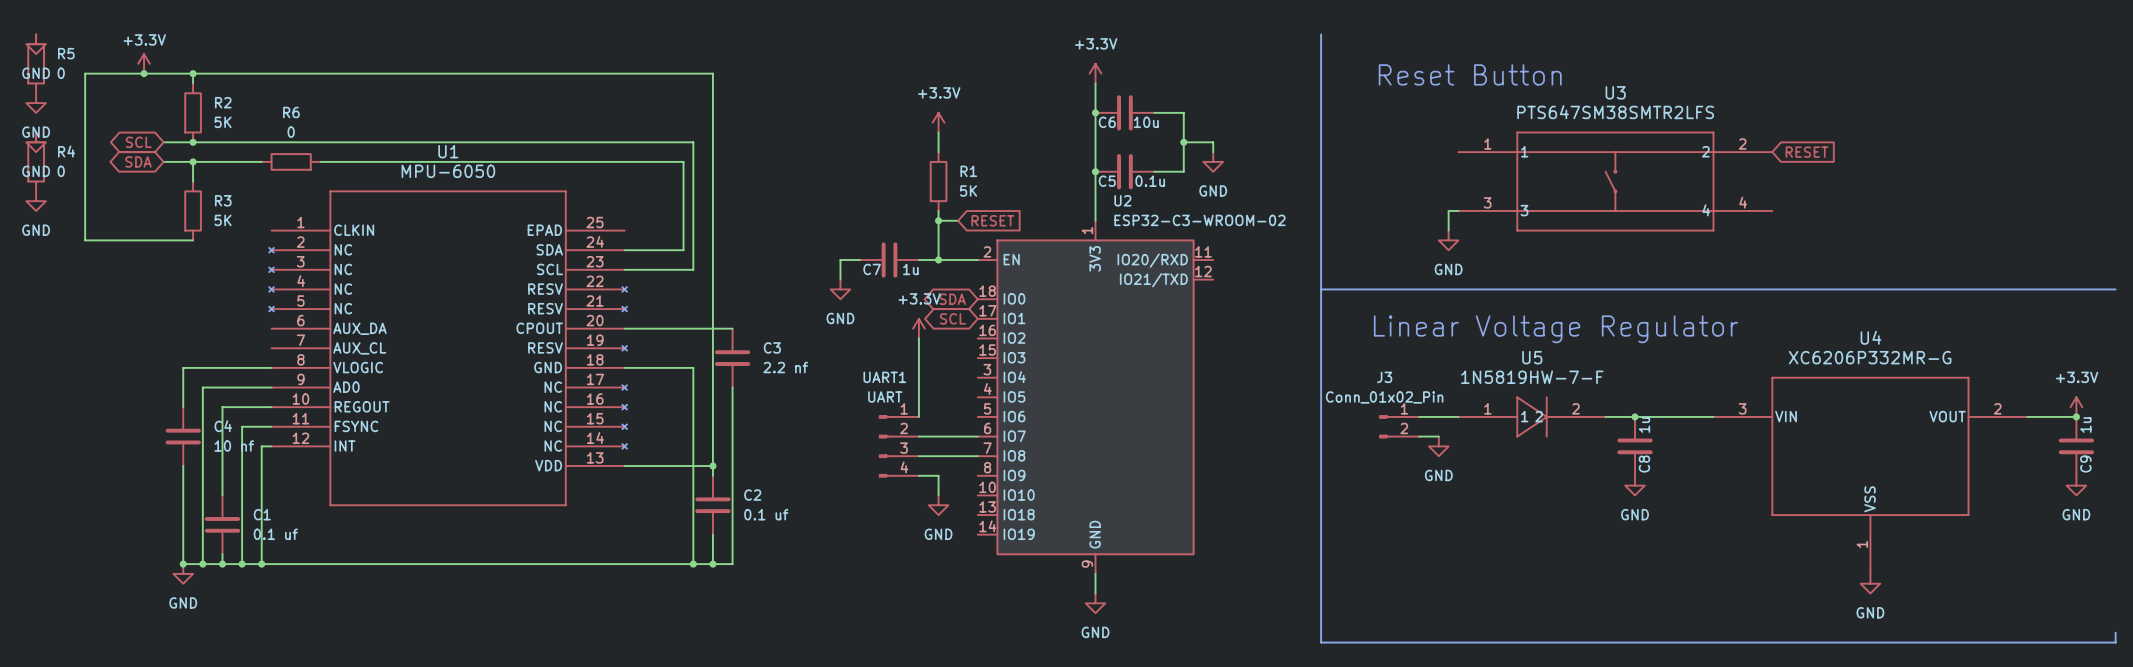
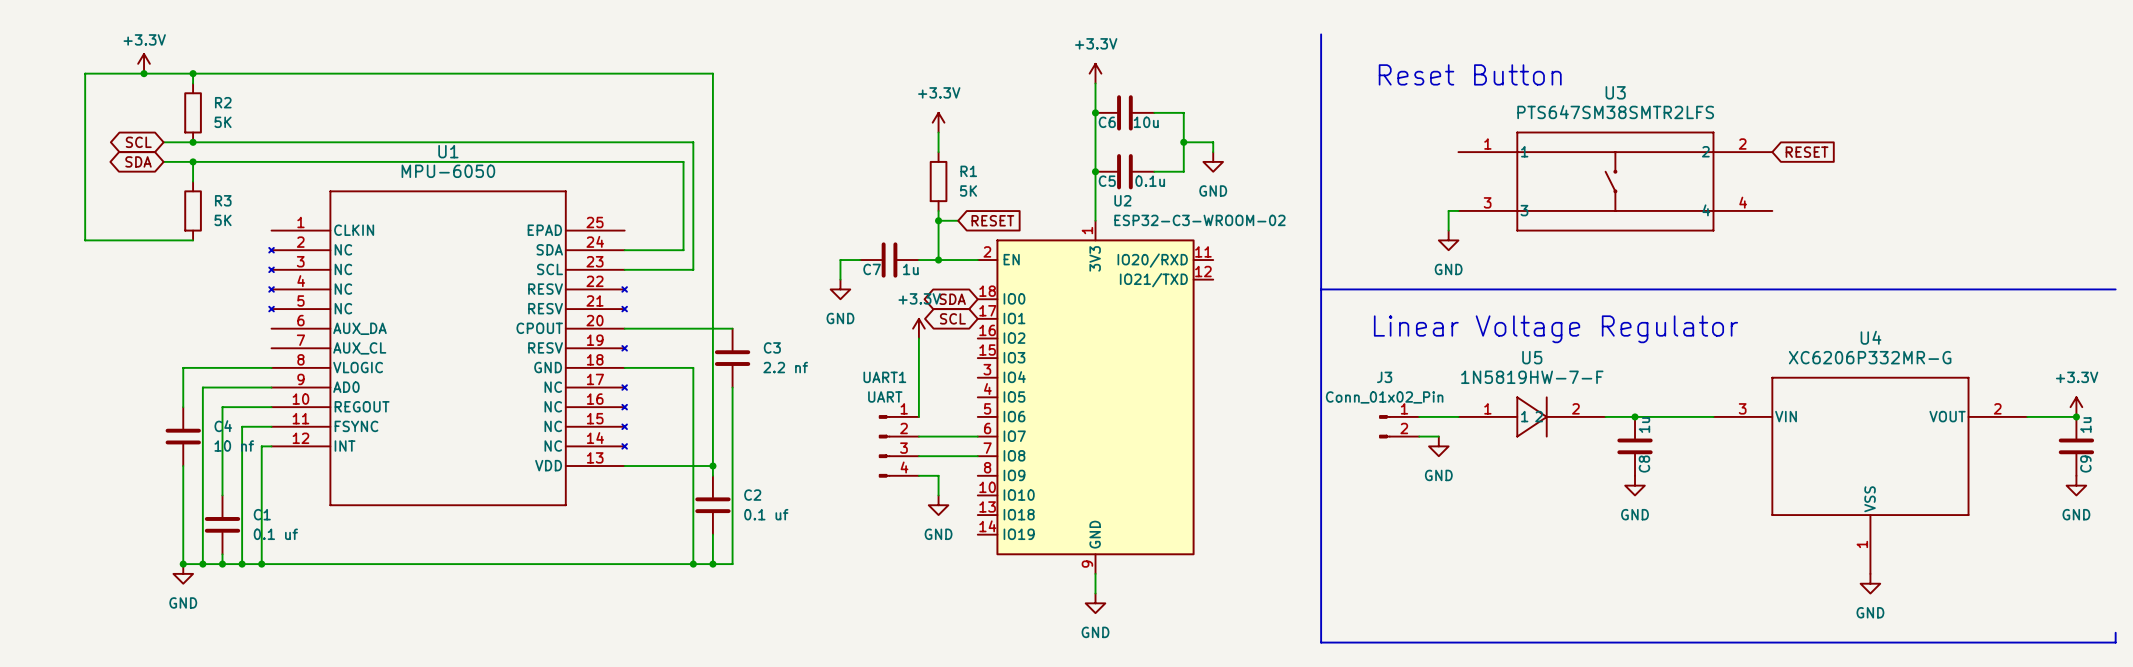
power symbol: GND (36, 44) -> none
R5: 0 (36, 63) -> none
power symbol: GND (36, 103) -> none
power symbol: GND (36, 142) -> none
R4: 0 (36, 161) -> none
wire: none -> (261, 161) (320, 161)
R6: 0 (291, 161) -> none
power symbol: GND (36, 201) -> none

